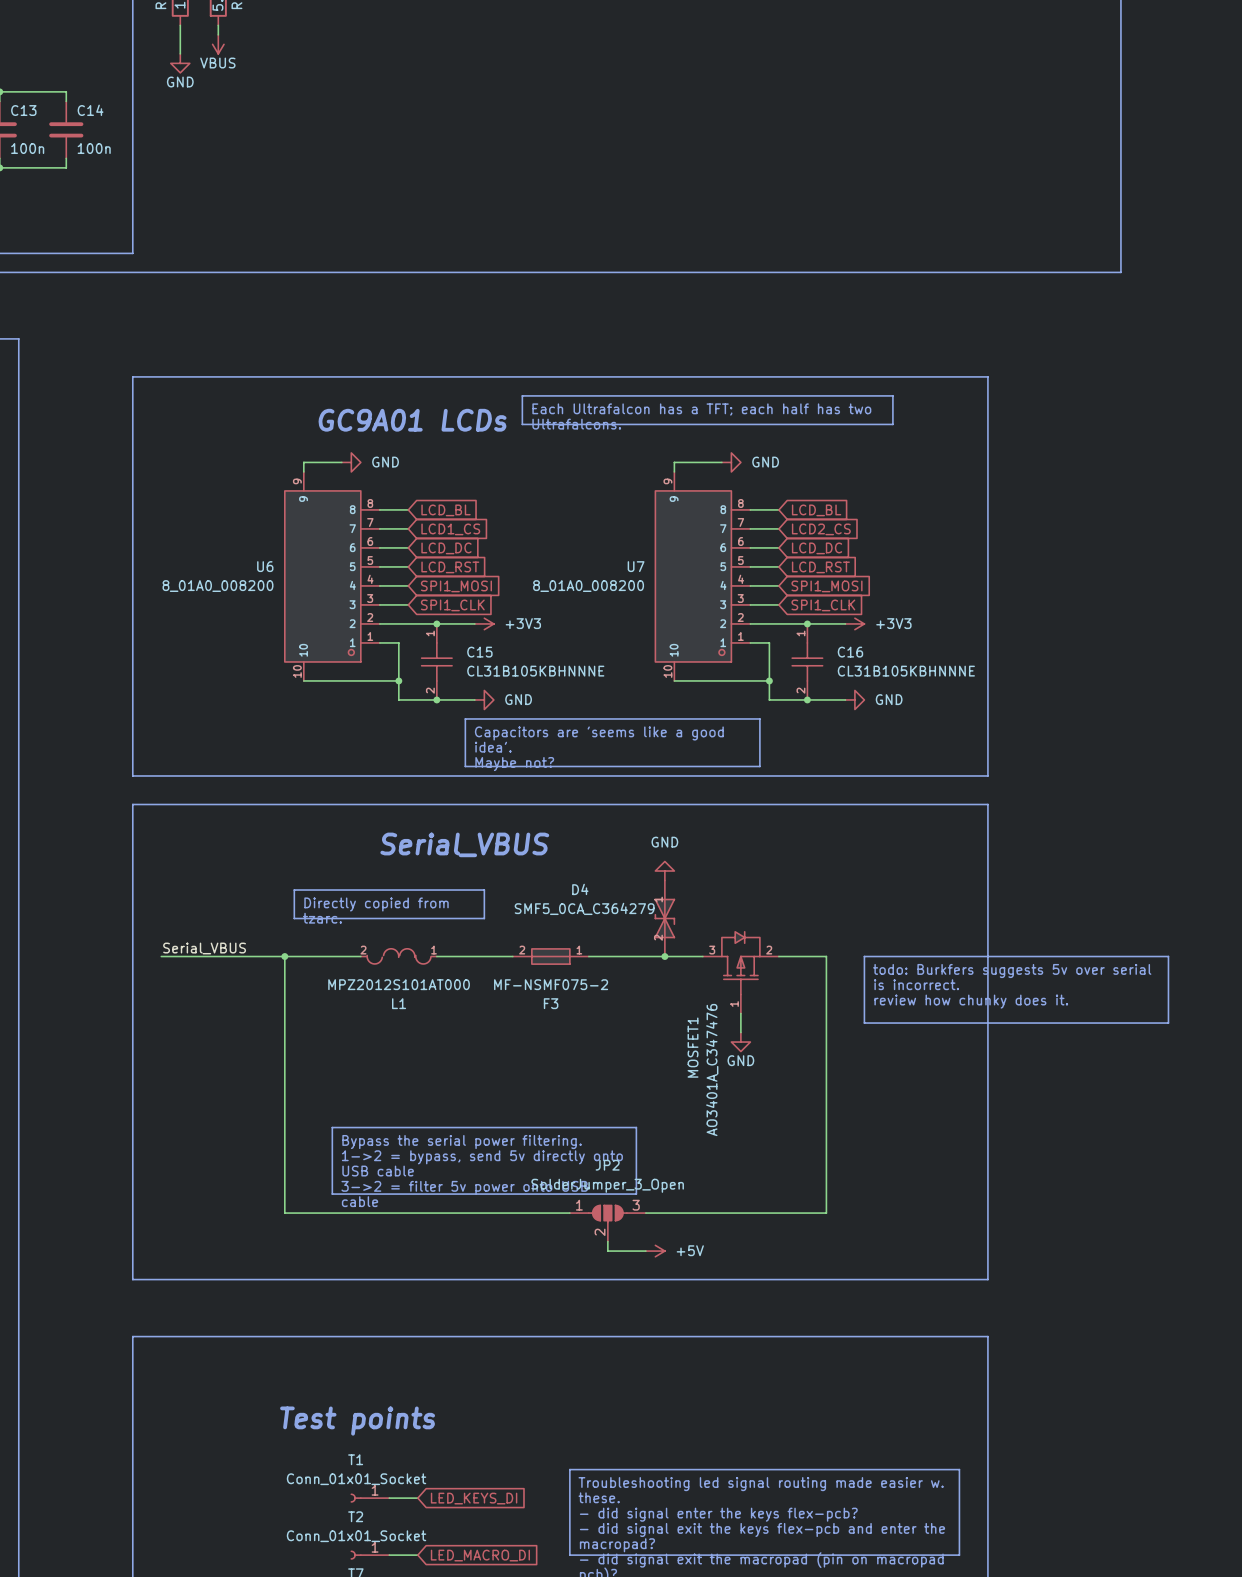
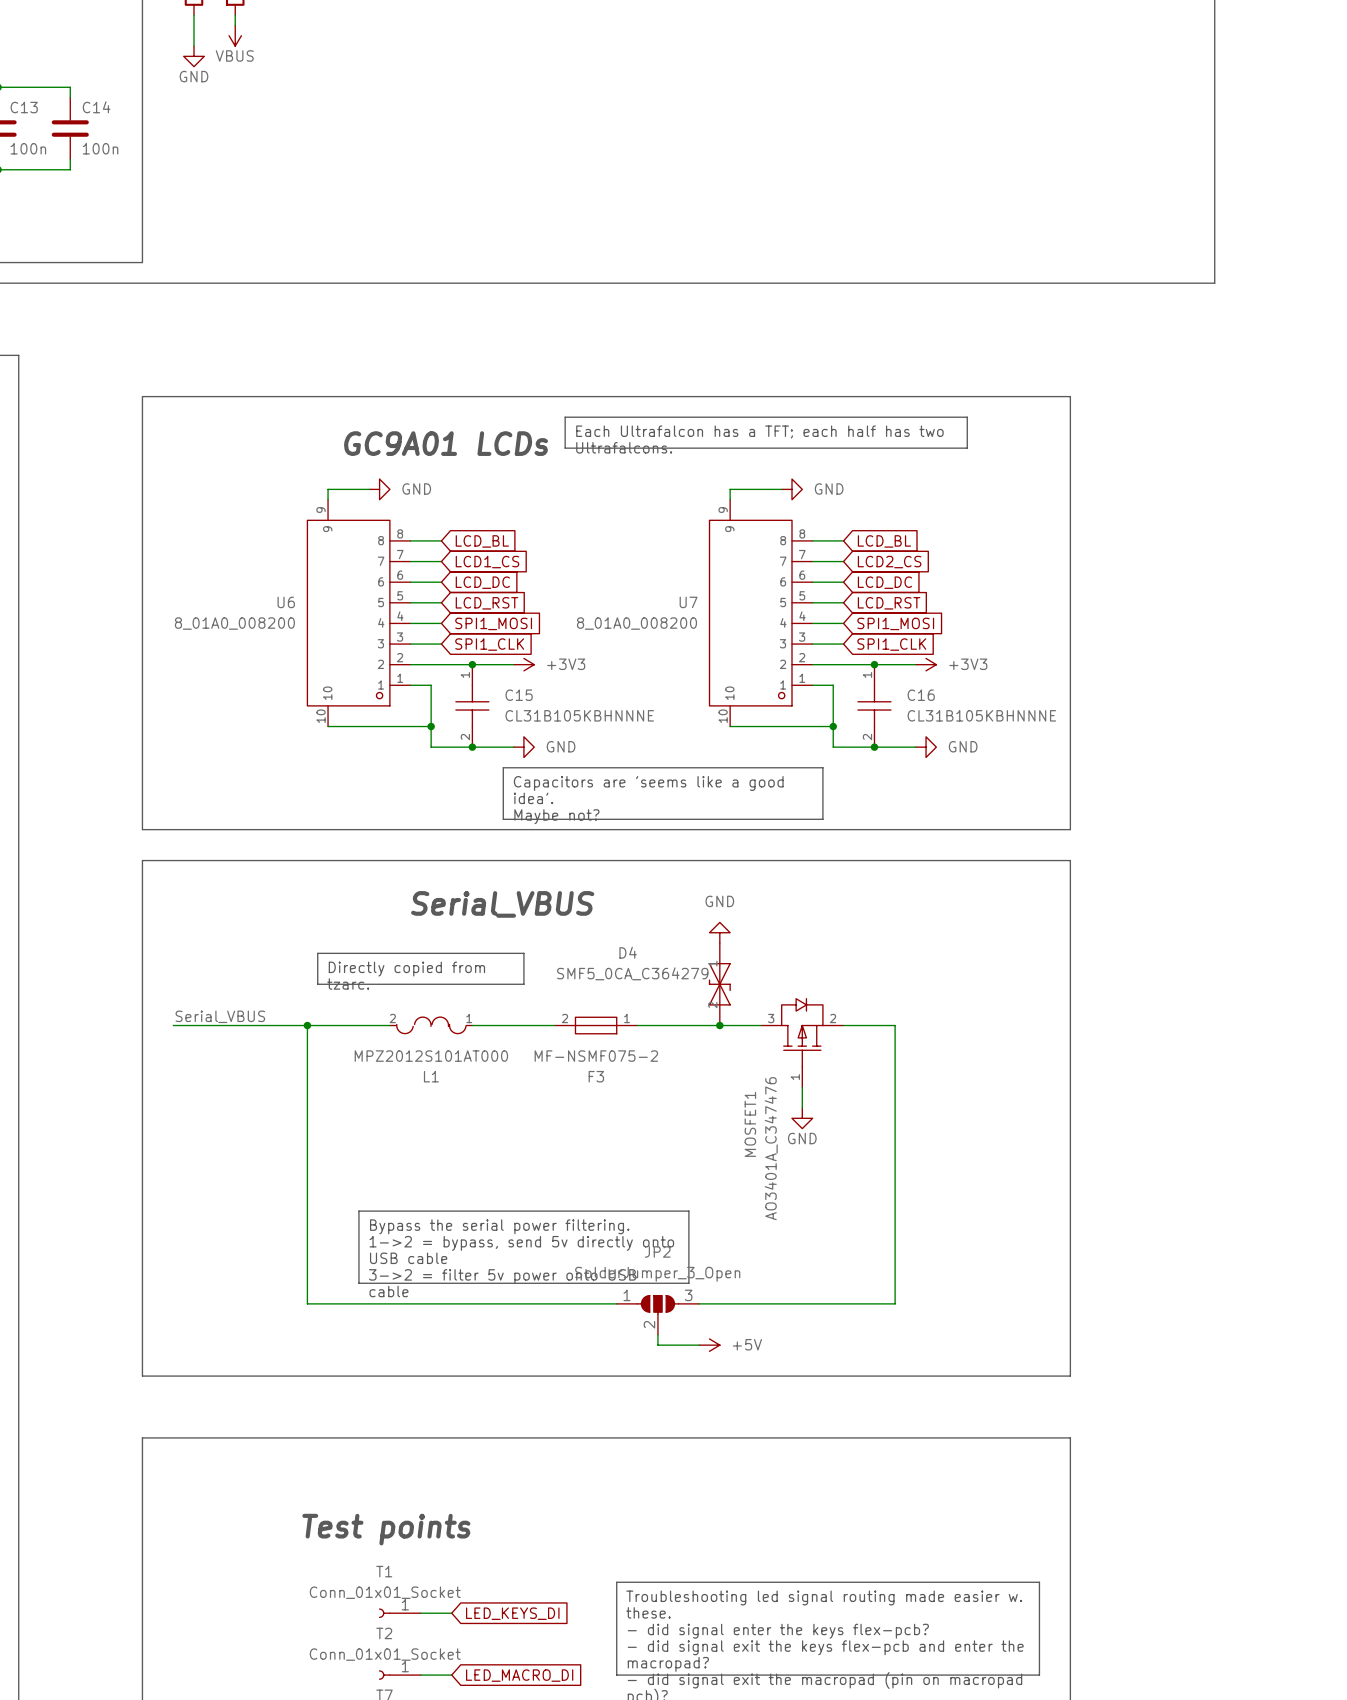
line: (864, 956) (1168, 956) (1168, 1023) (864, 1023) (864, 956) -> none
text: todo: Burkfers suggests 5v over serial (1012, 971) -> none
text: is incorrect. (916, 984) -> none
text: review how chunky does it. (971, 1001) -> none

